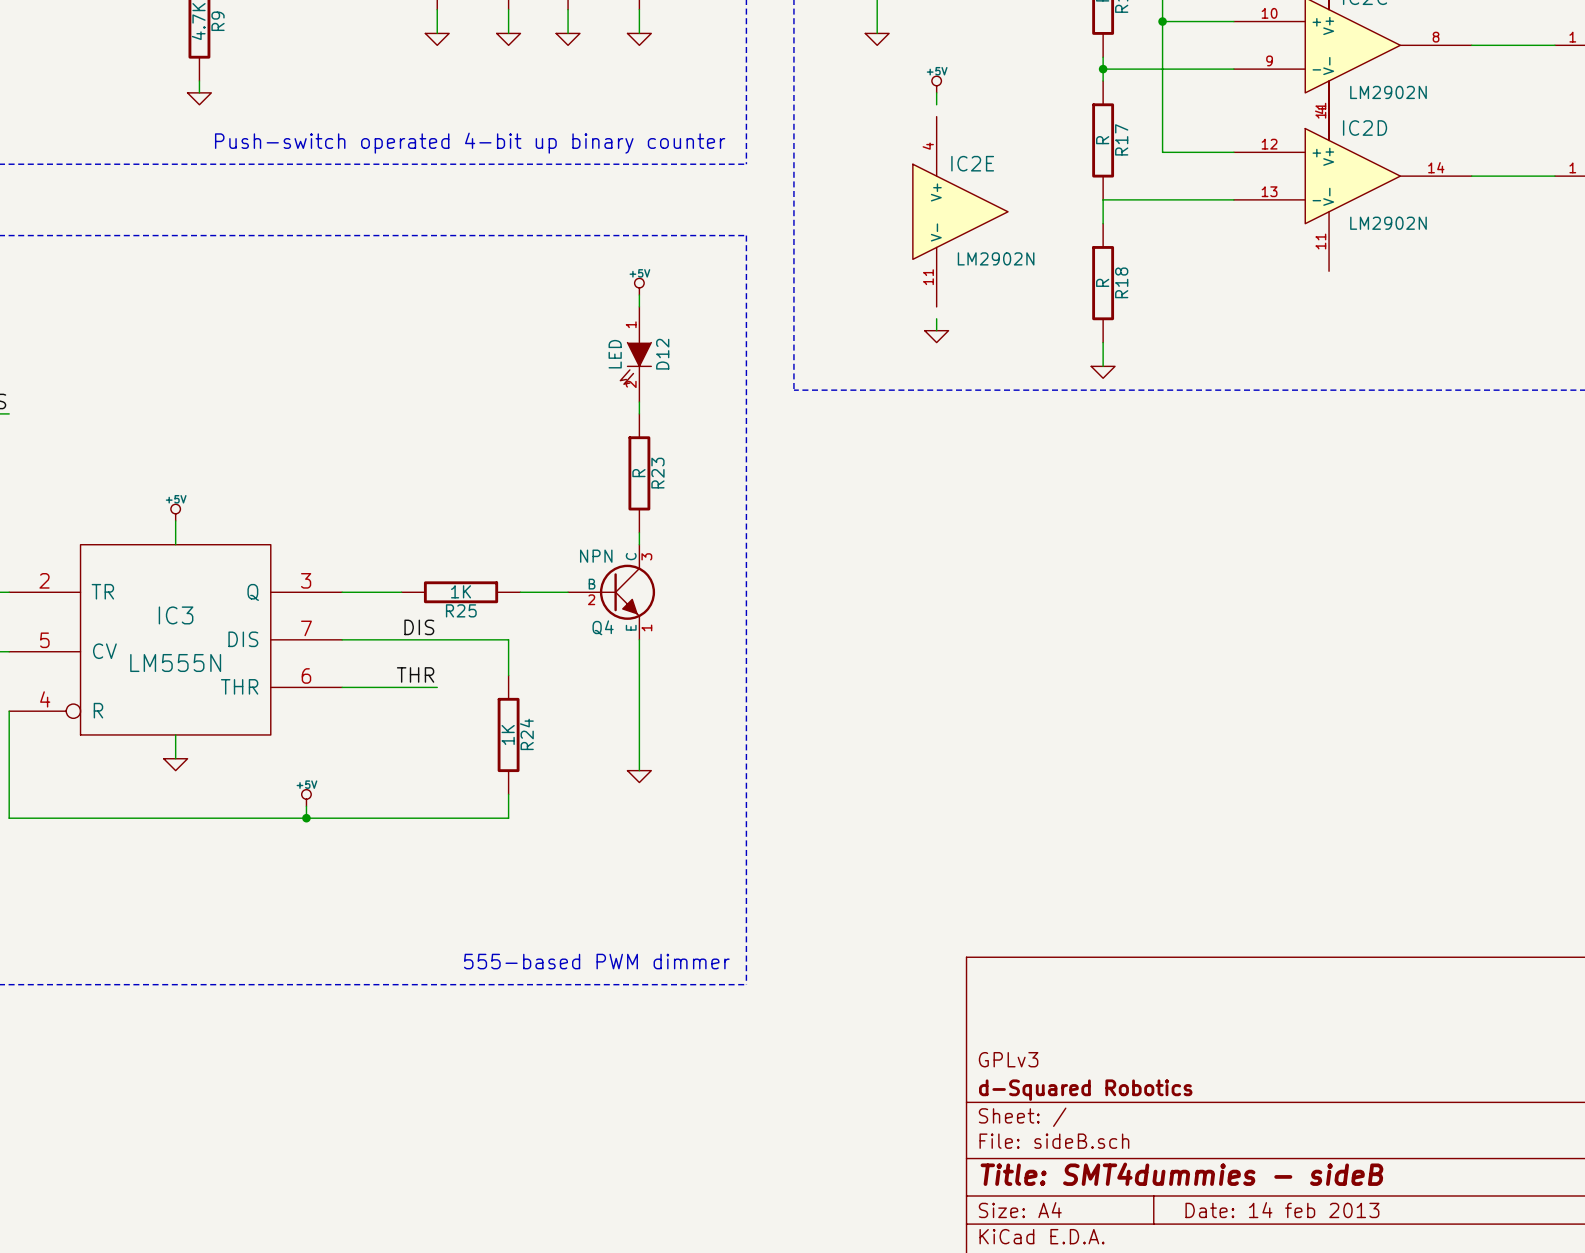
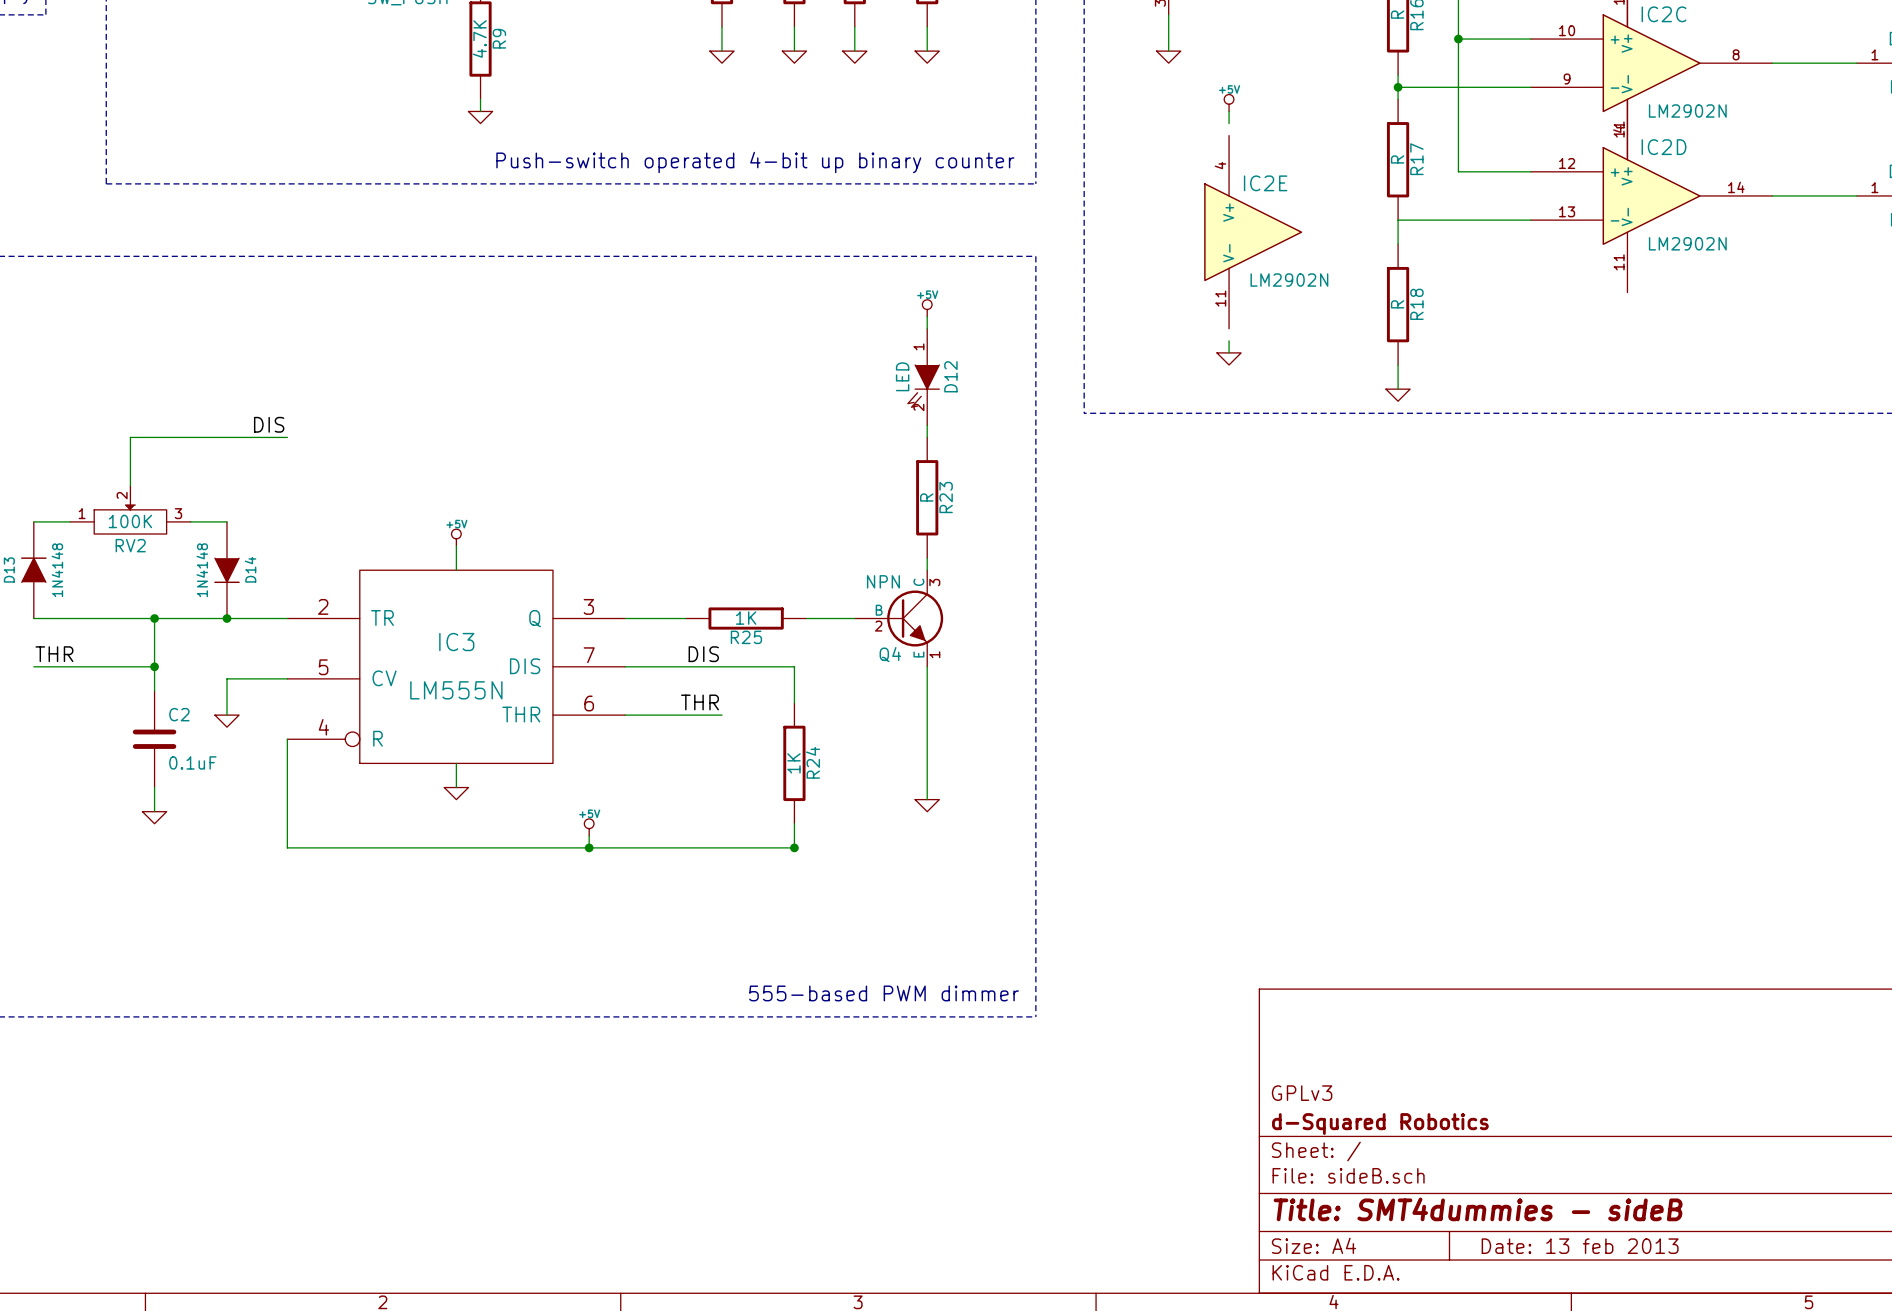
junction: none -> (794, 847)
title block: Date: 14 feb 2013 (1282, 1210) -> Date: 13 feb 2013 (1580, 1246)

